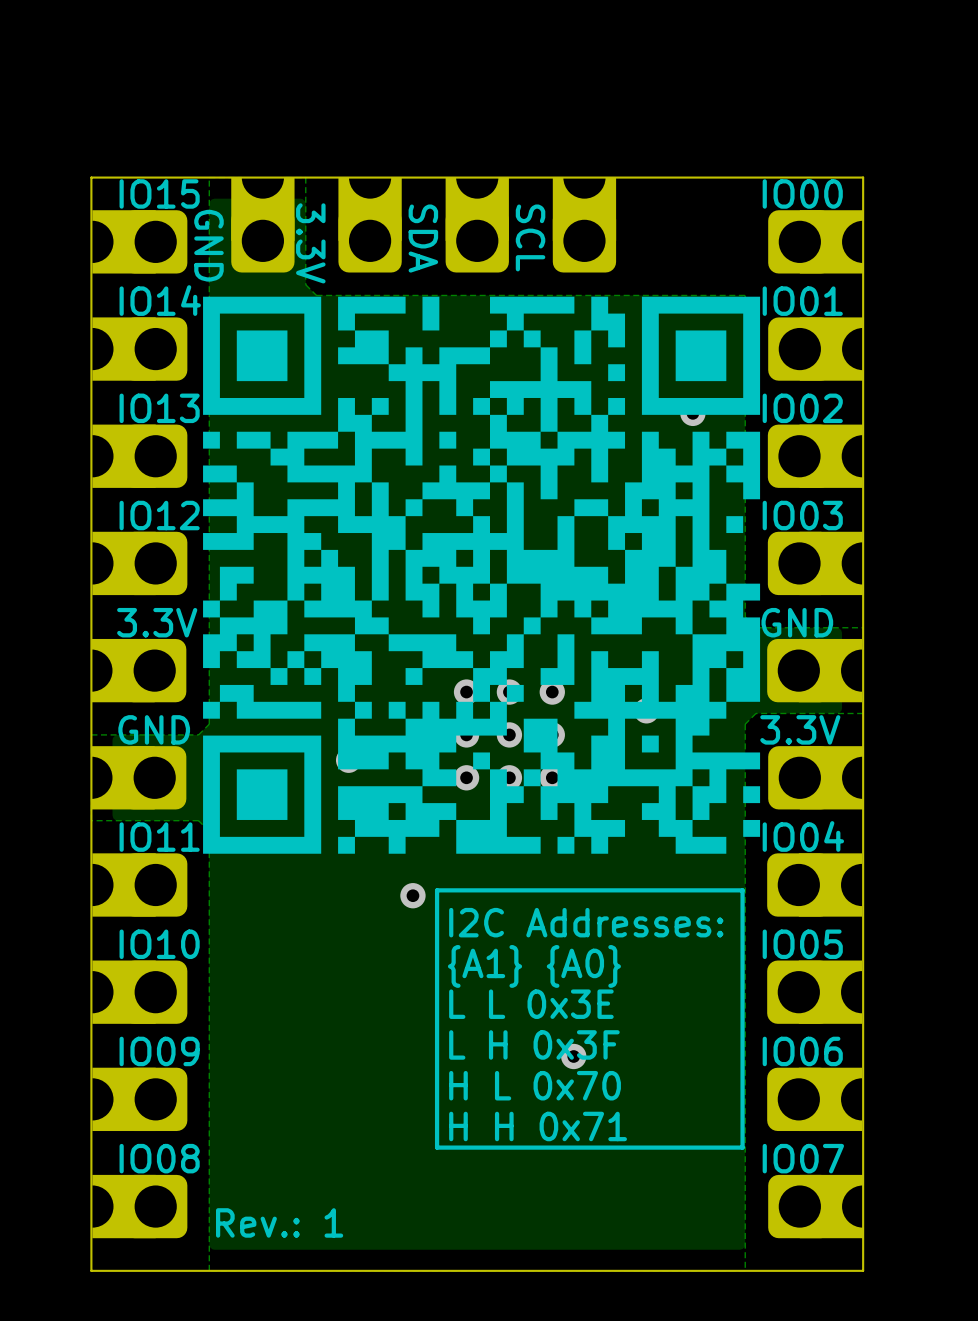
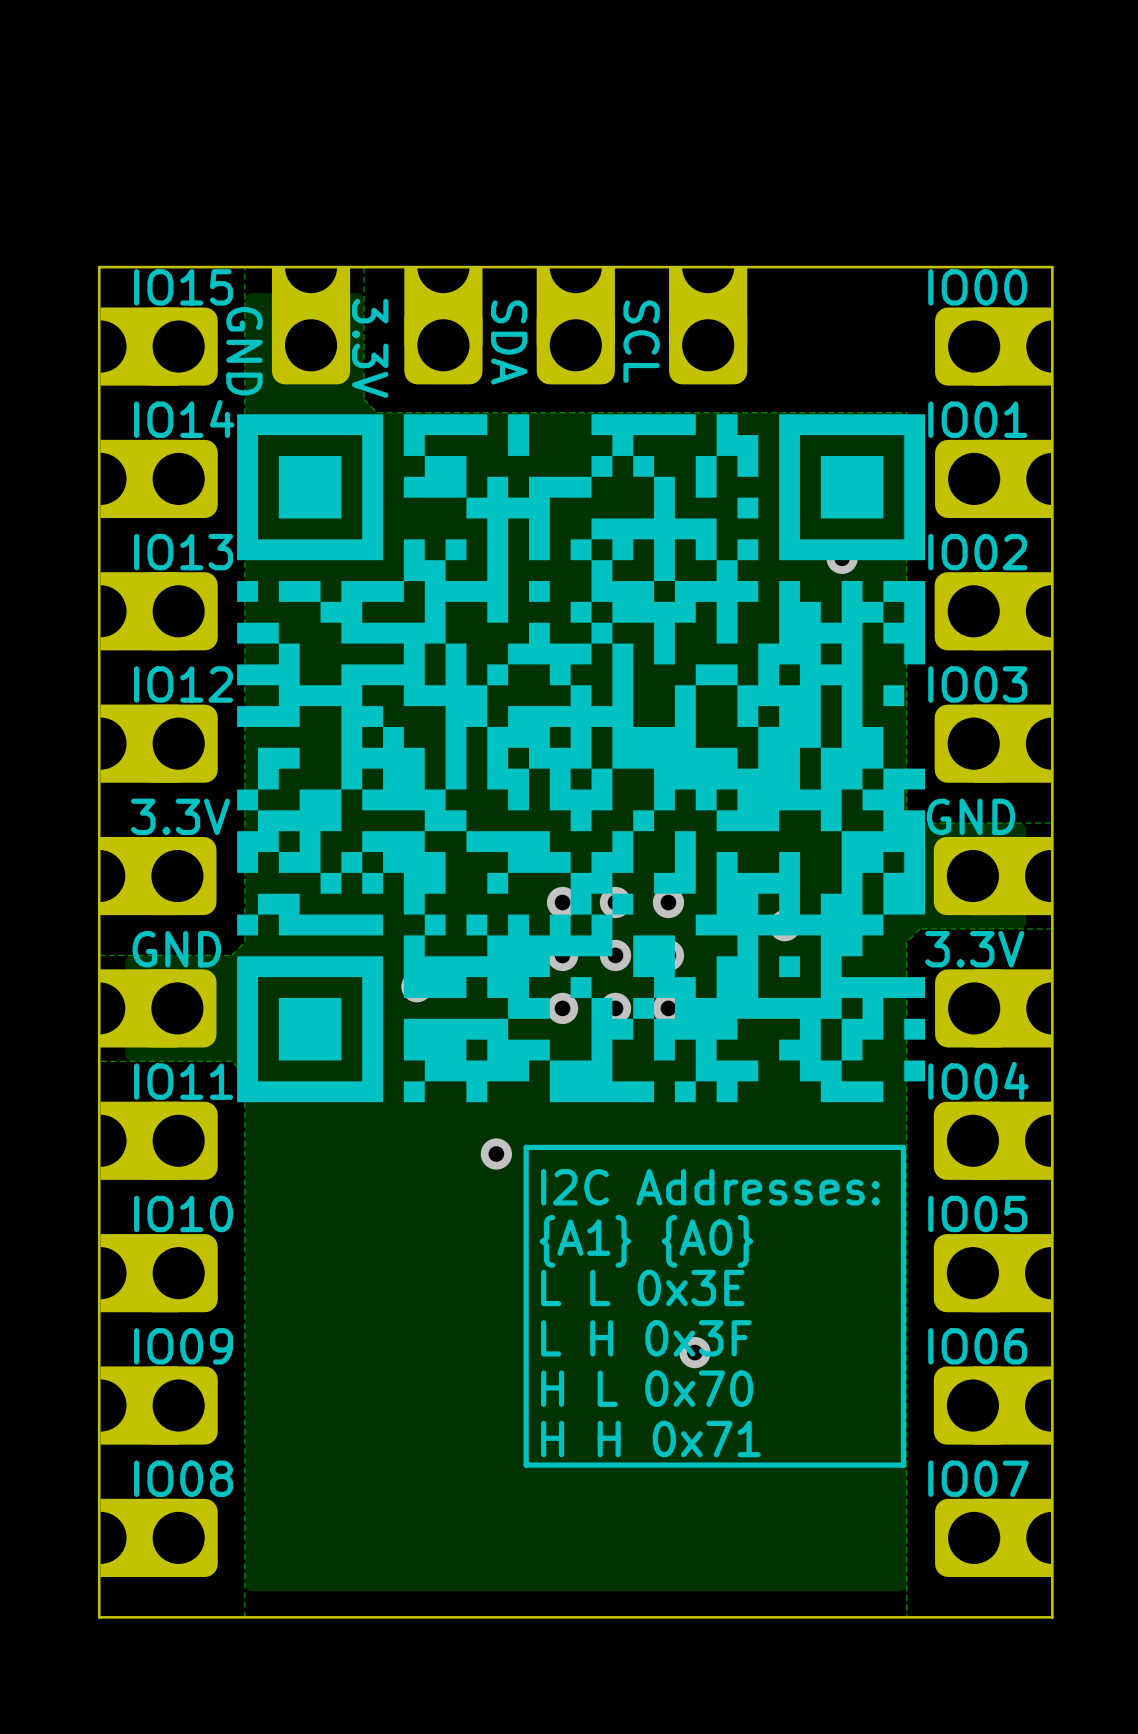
text: Rev.: 1 (279, 1222) -> none

